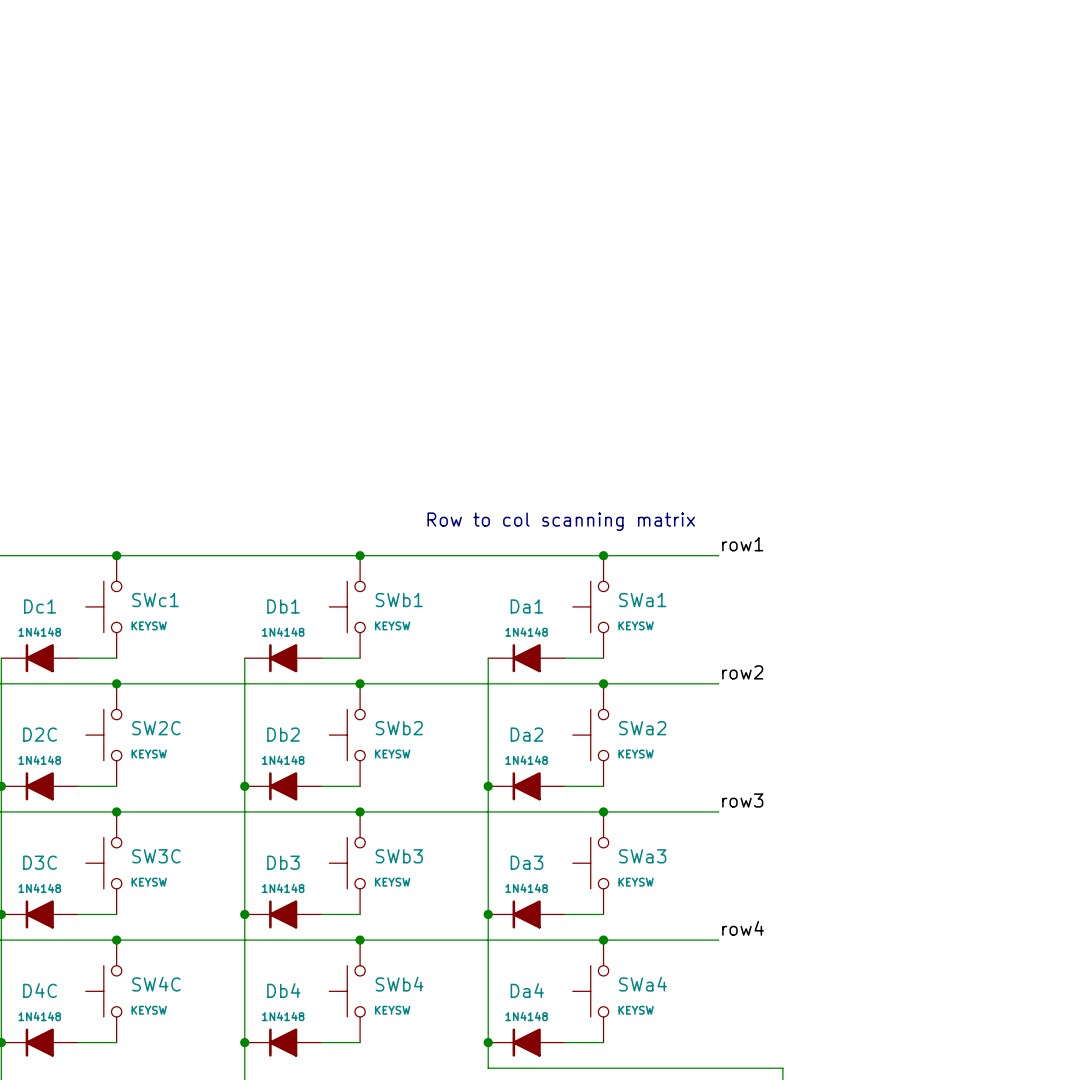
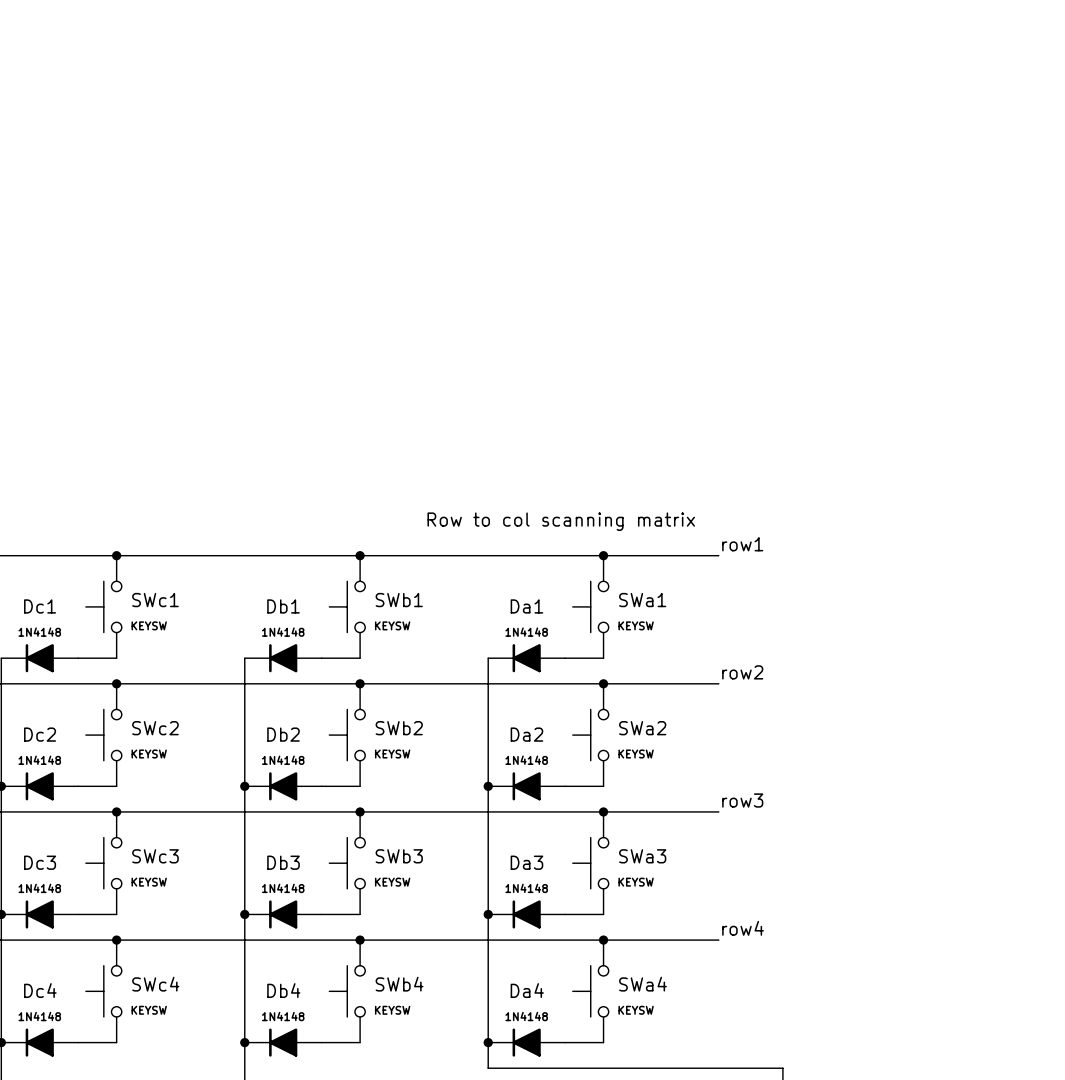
SW2C name: SW2C (156, 728) -> SWc2 (155, 728)
D2C name: D2C (40, 734) -> Dc2 (40, 734)
SW3C name: SW3C (156, 856) -> SWc3 (155, 856)
D3C name: D3C (40, 862) -> Dc3 (40, 862)
SW4C name: SW4C (156, 984) -> SWc4 (155, 984)
D4C name: D4C (40, 990) -> Dc4 (40, 990)

